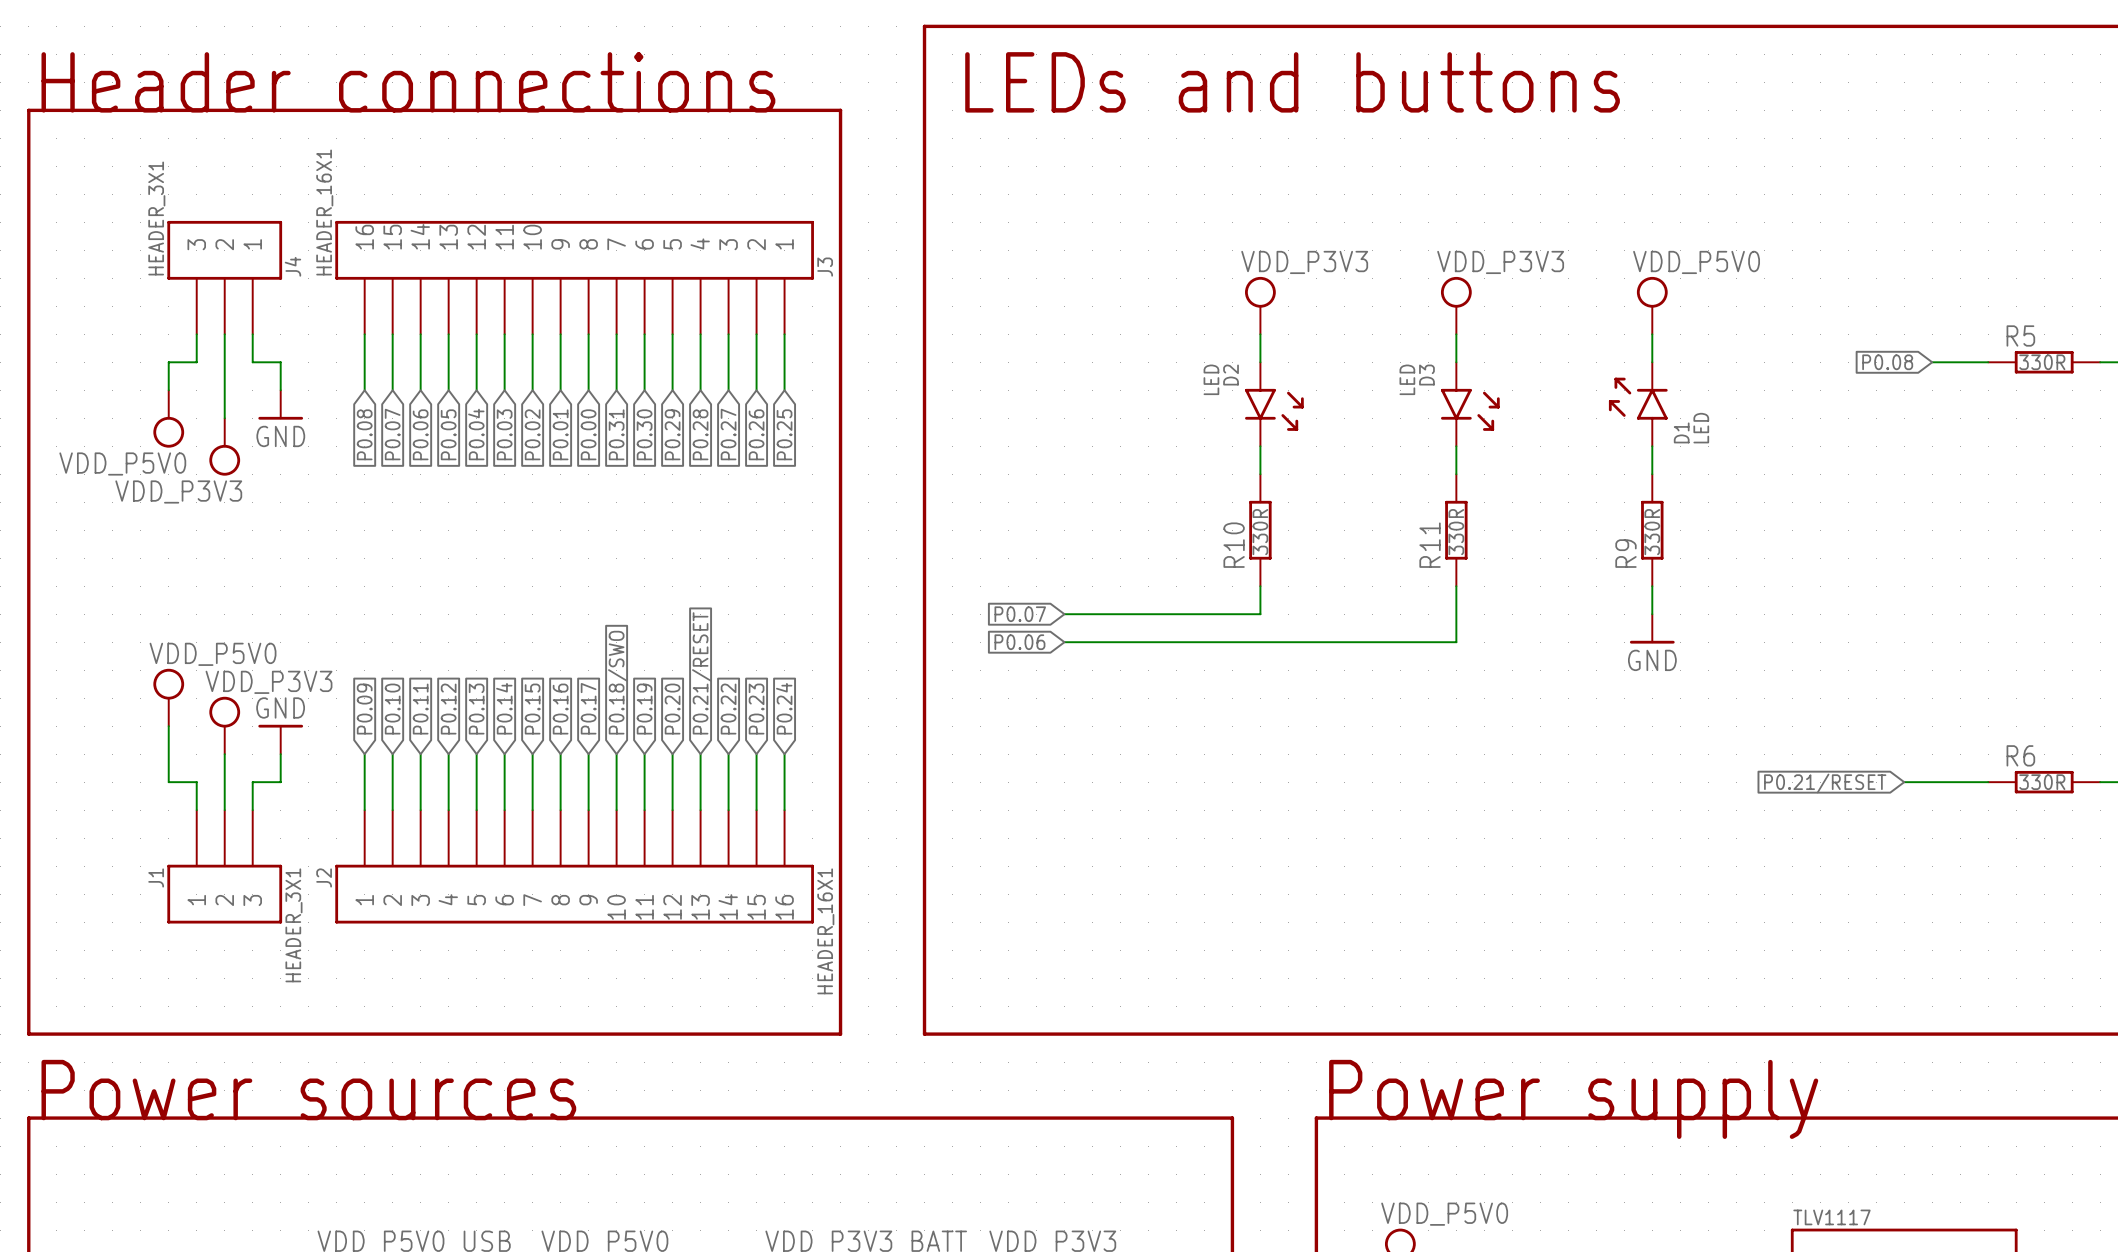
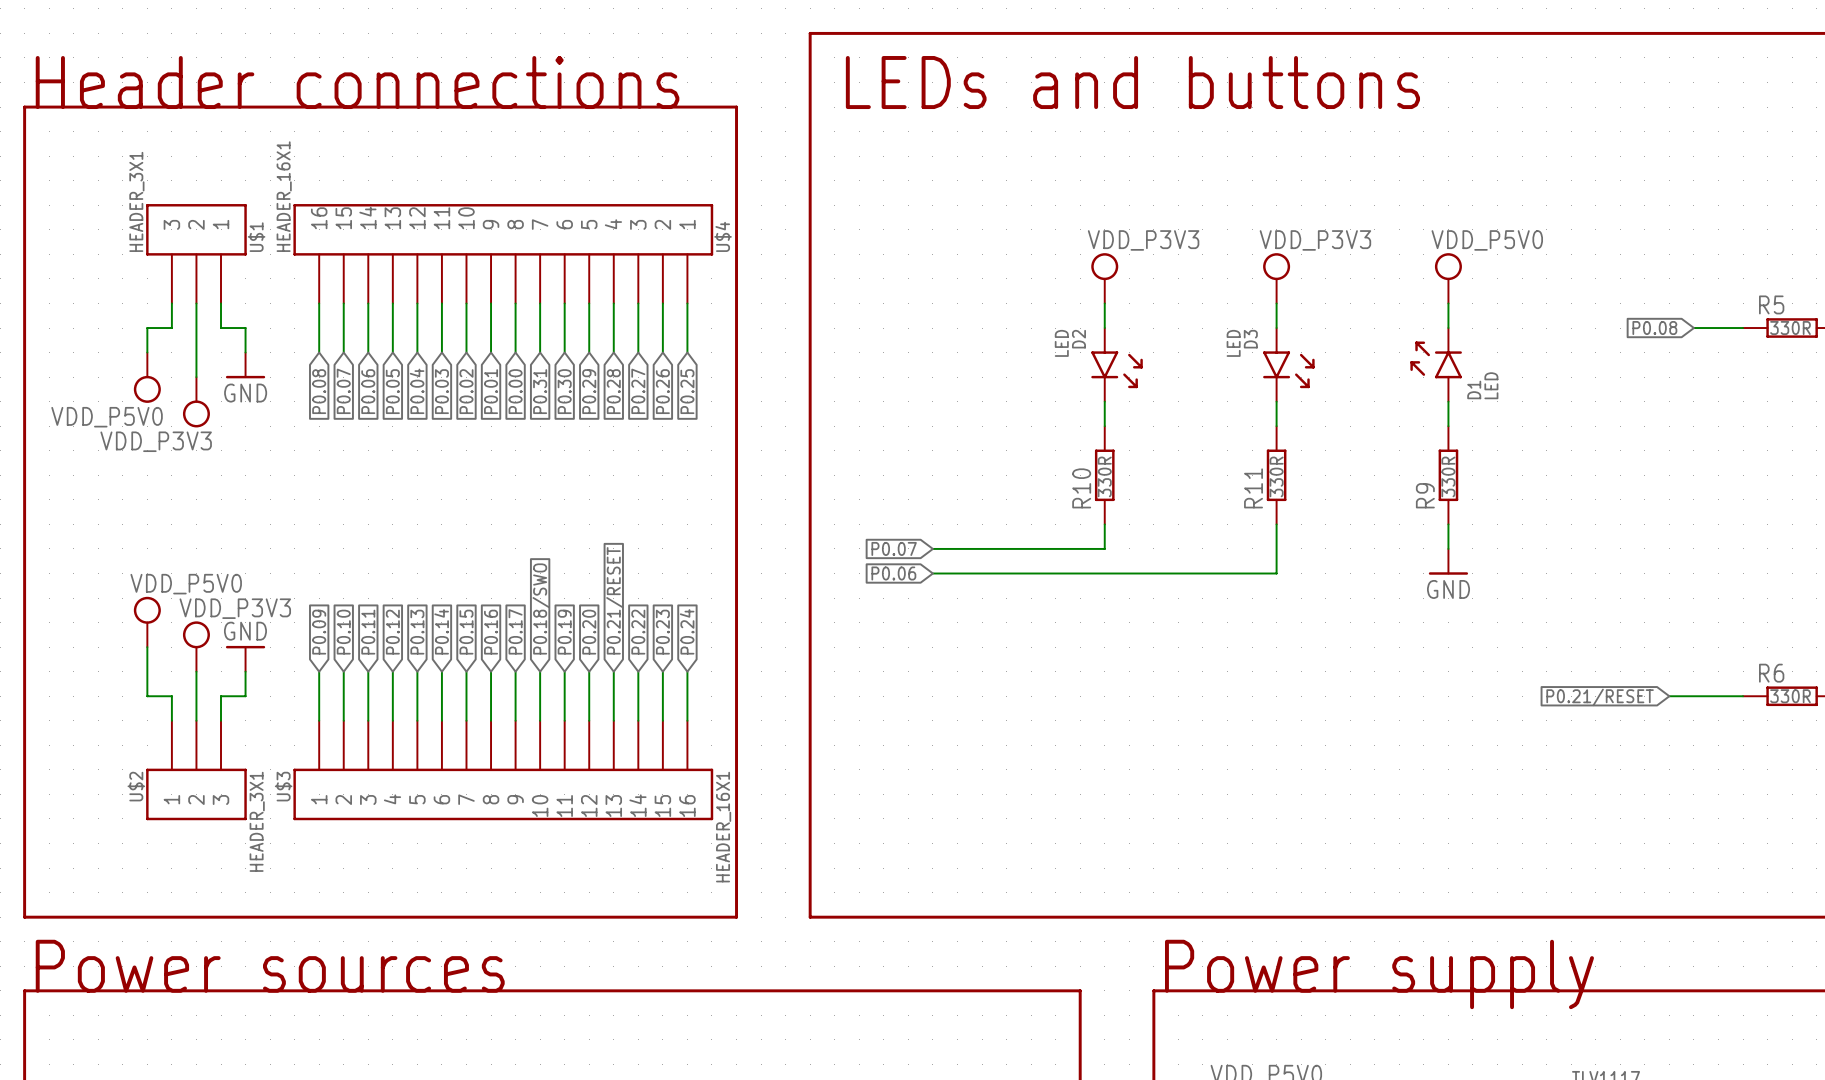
J4 name: J4 (292, 266) -> U$1 (256, 237)
J3 name: J3 (825, 267) -> U$4 (723, 236)
J1 name: J1 (156, 877) -> U$2 (136, 786)
J2 name: J2 (324, 877) -> U$3 (283, 786)

